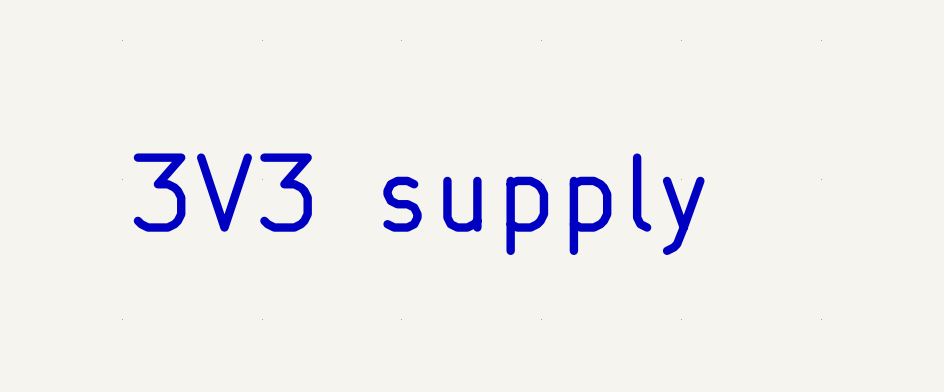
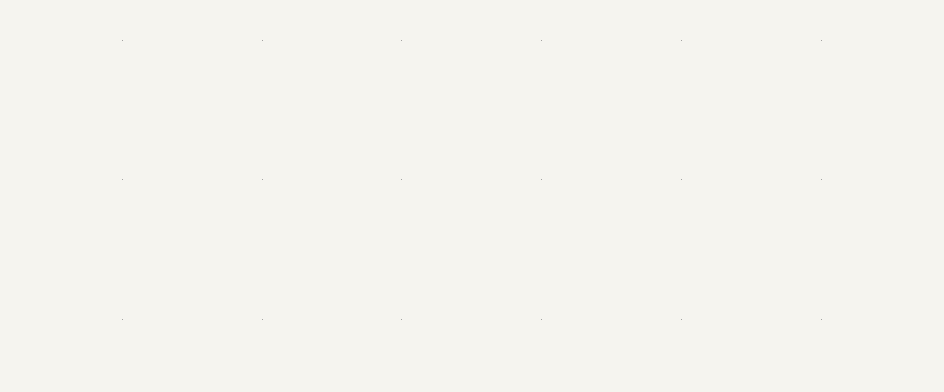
text: 3V3 supply (419, 204) -> none

